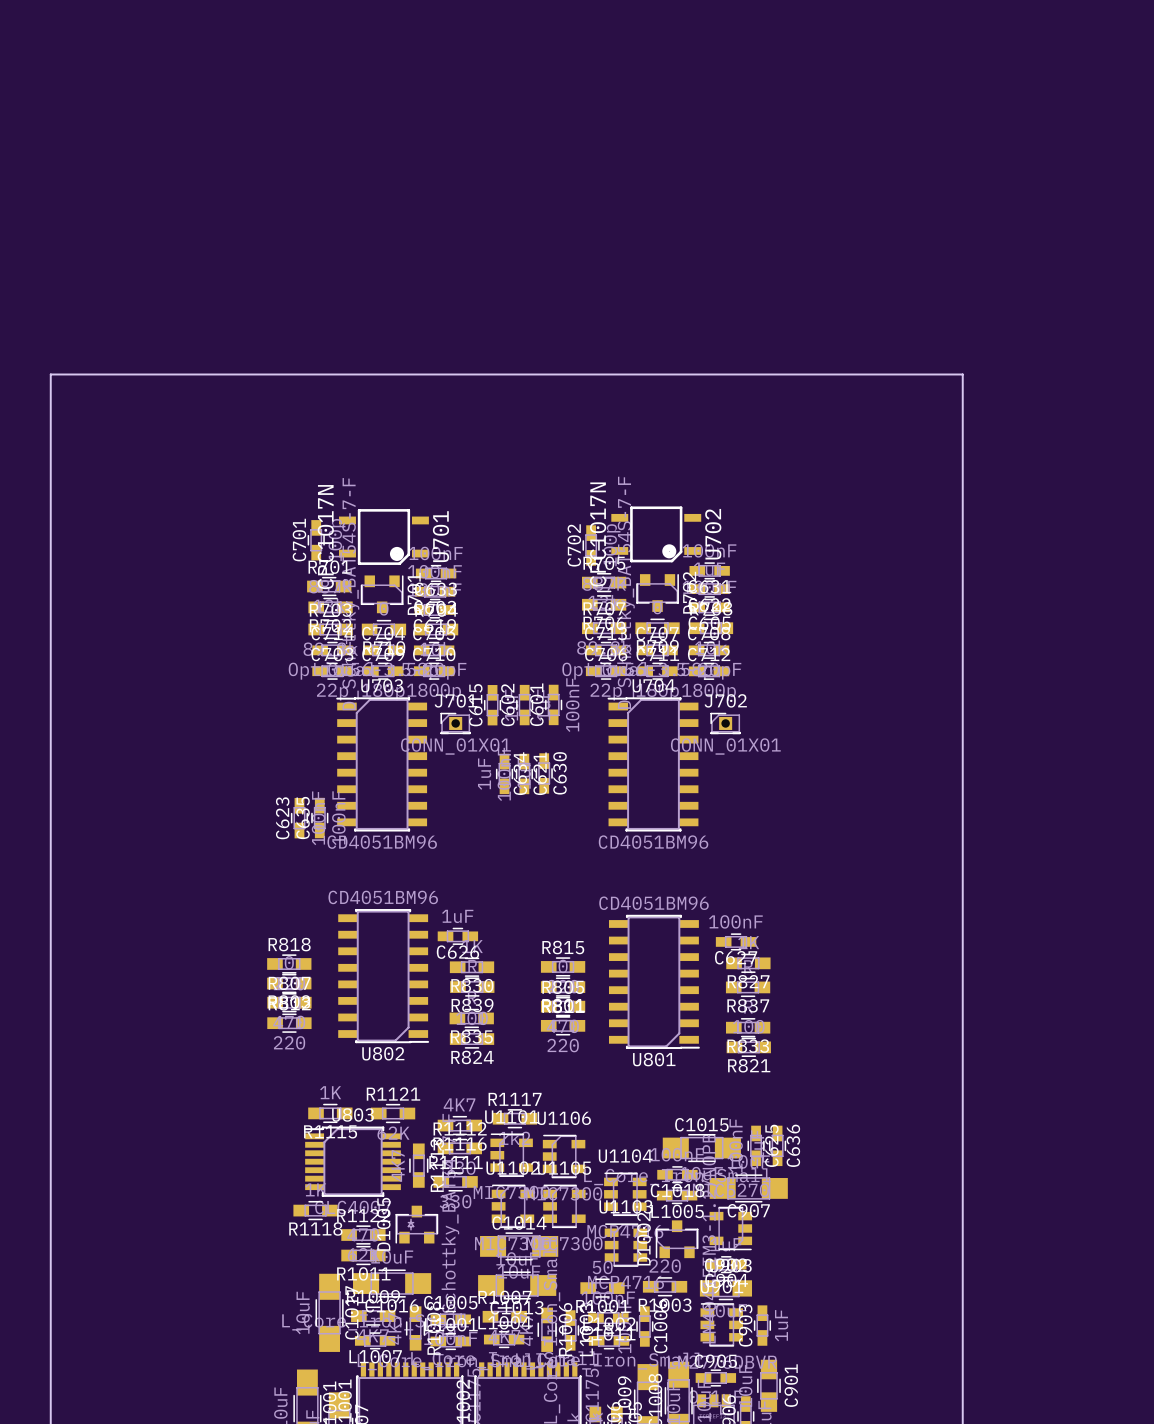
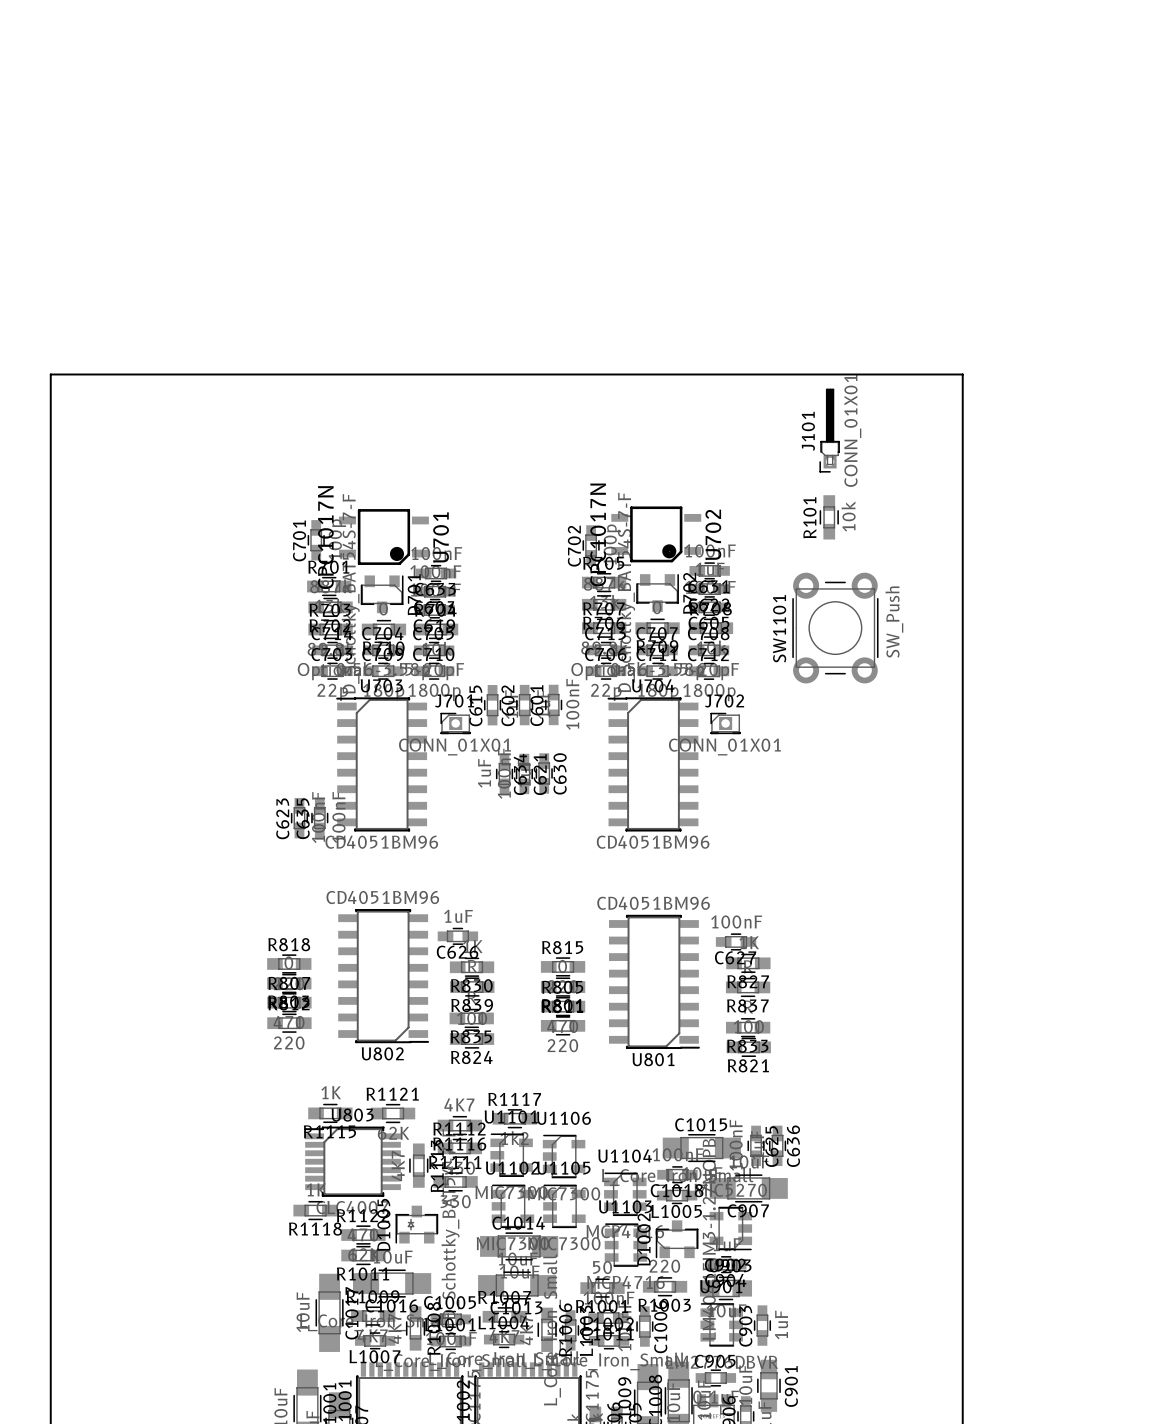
J101: none -> CONN_01X01 (829, 430)
R101: none -> 10k (829, 517)
SW1101: none -> SW_Push (835, 628)

